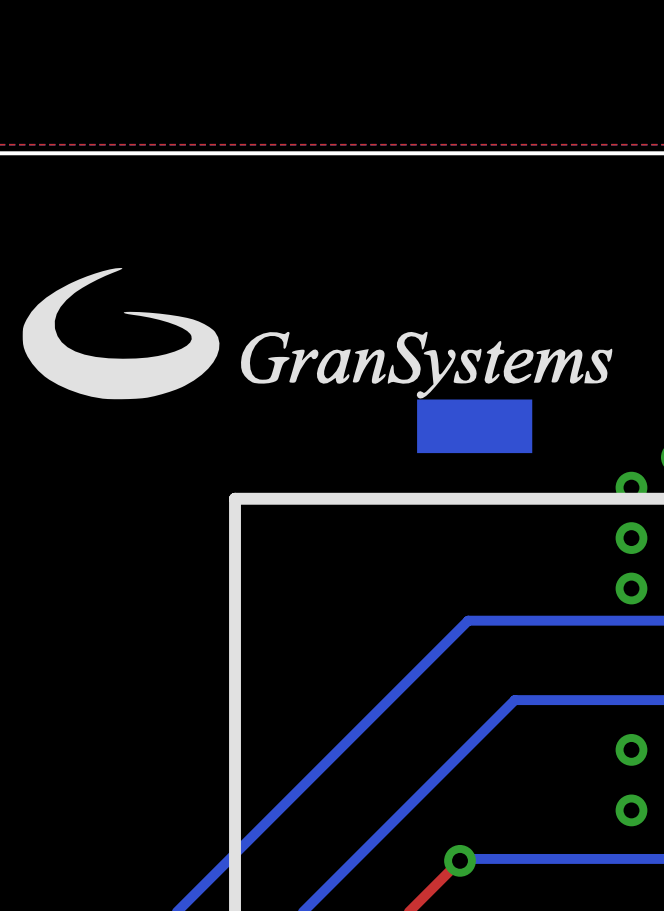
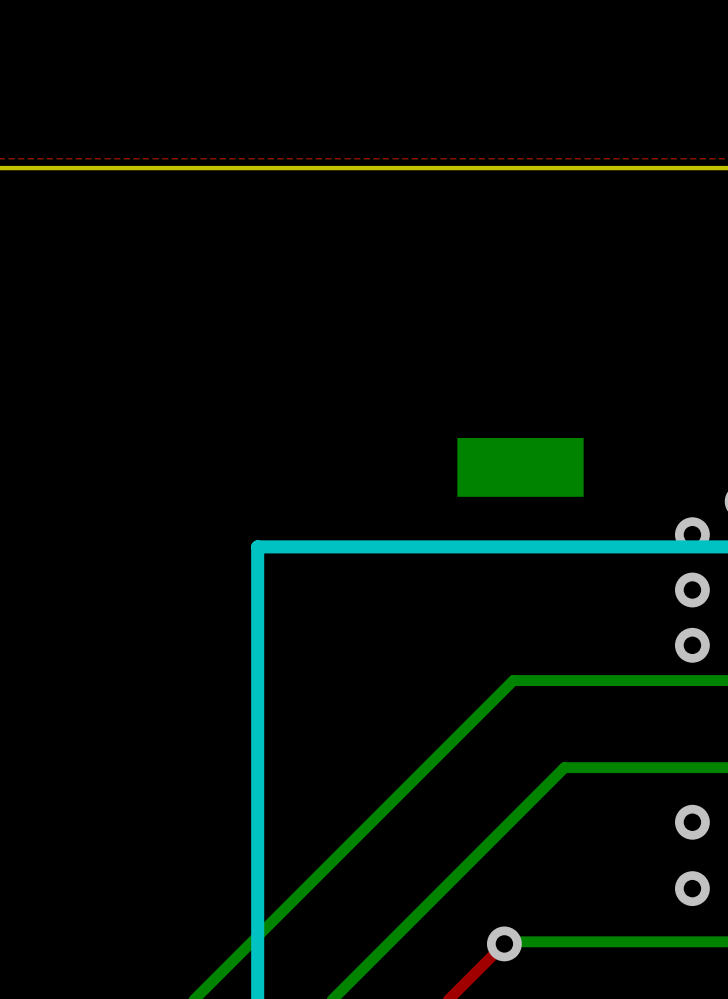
drawing: [22, 267, 613, 400] -> none

